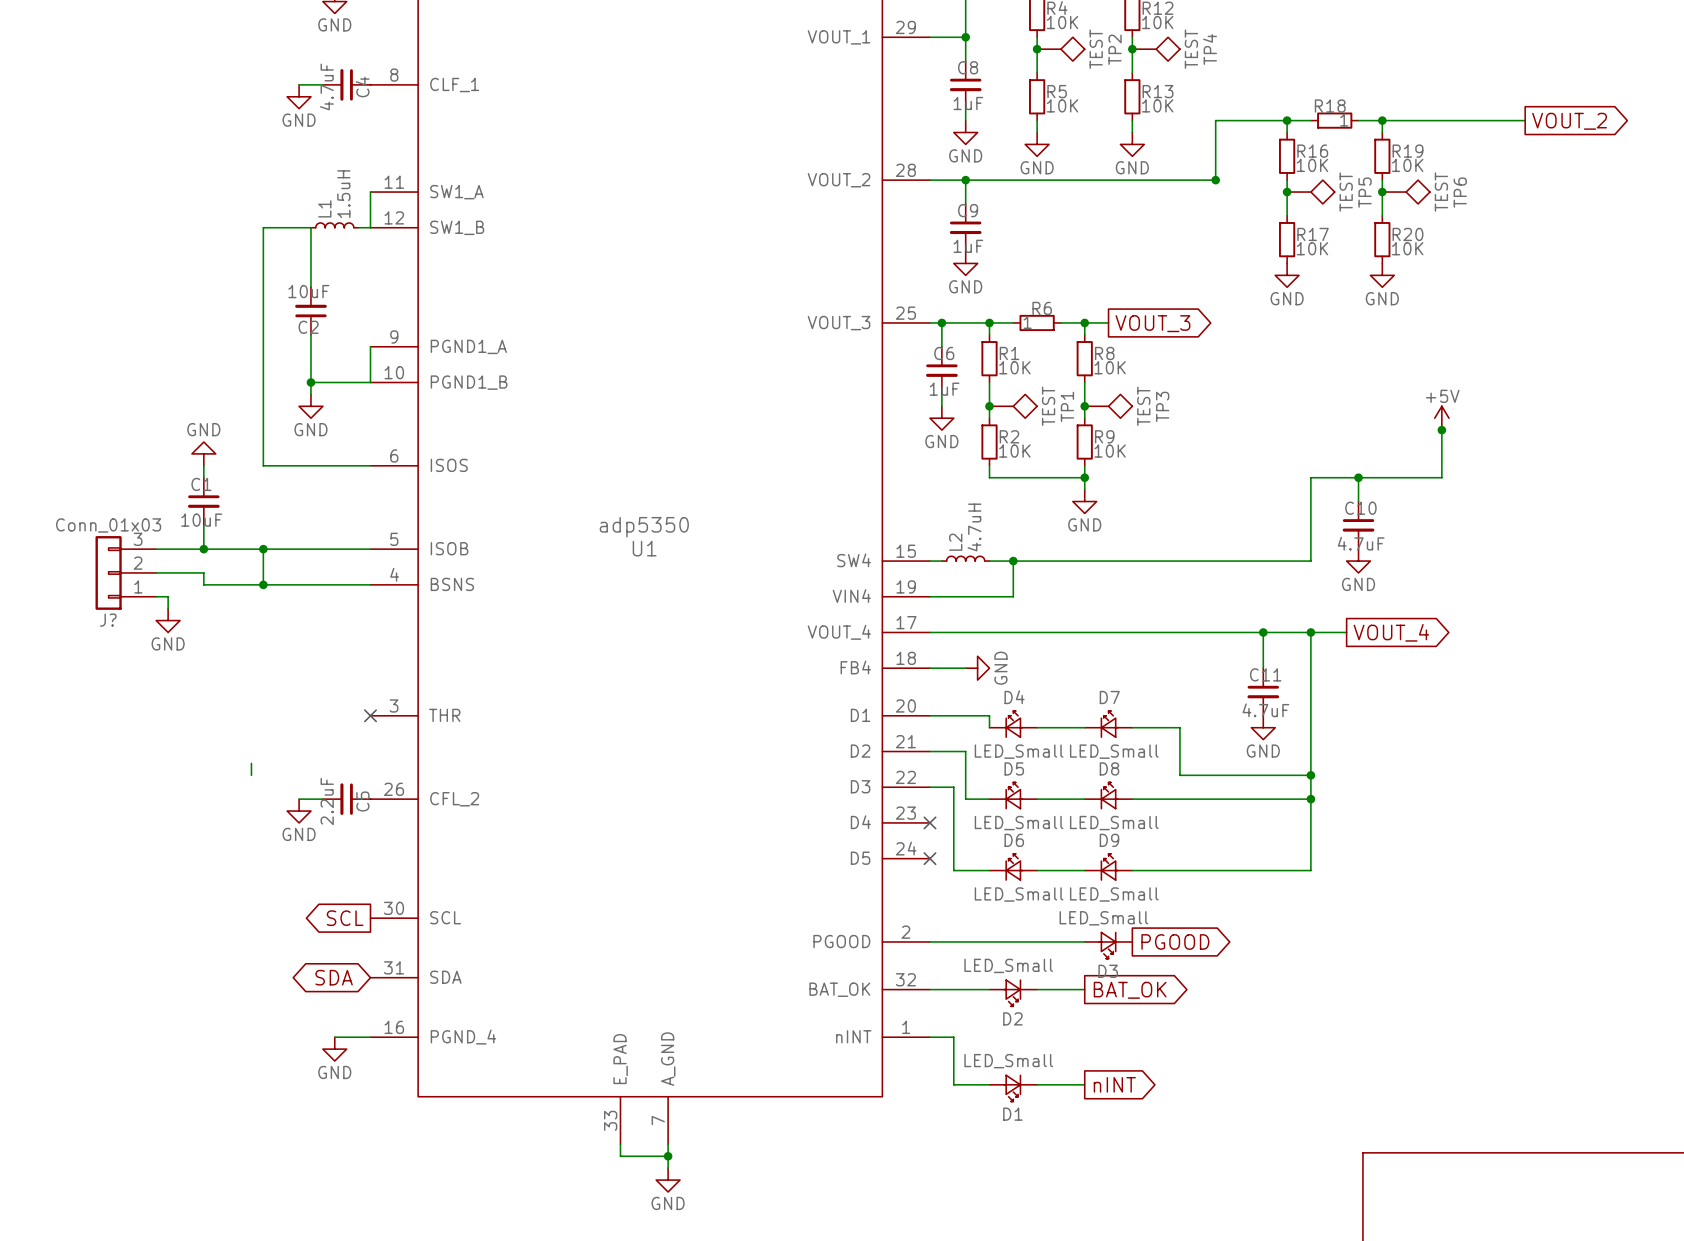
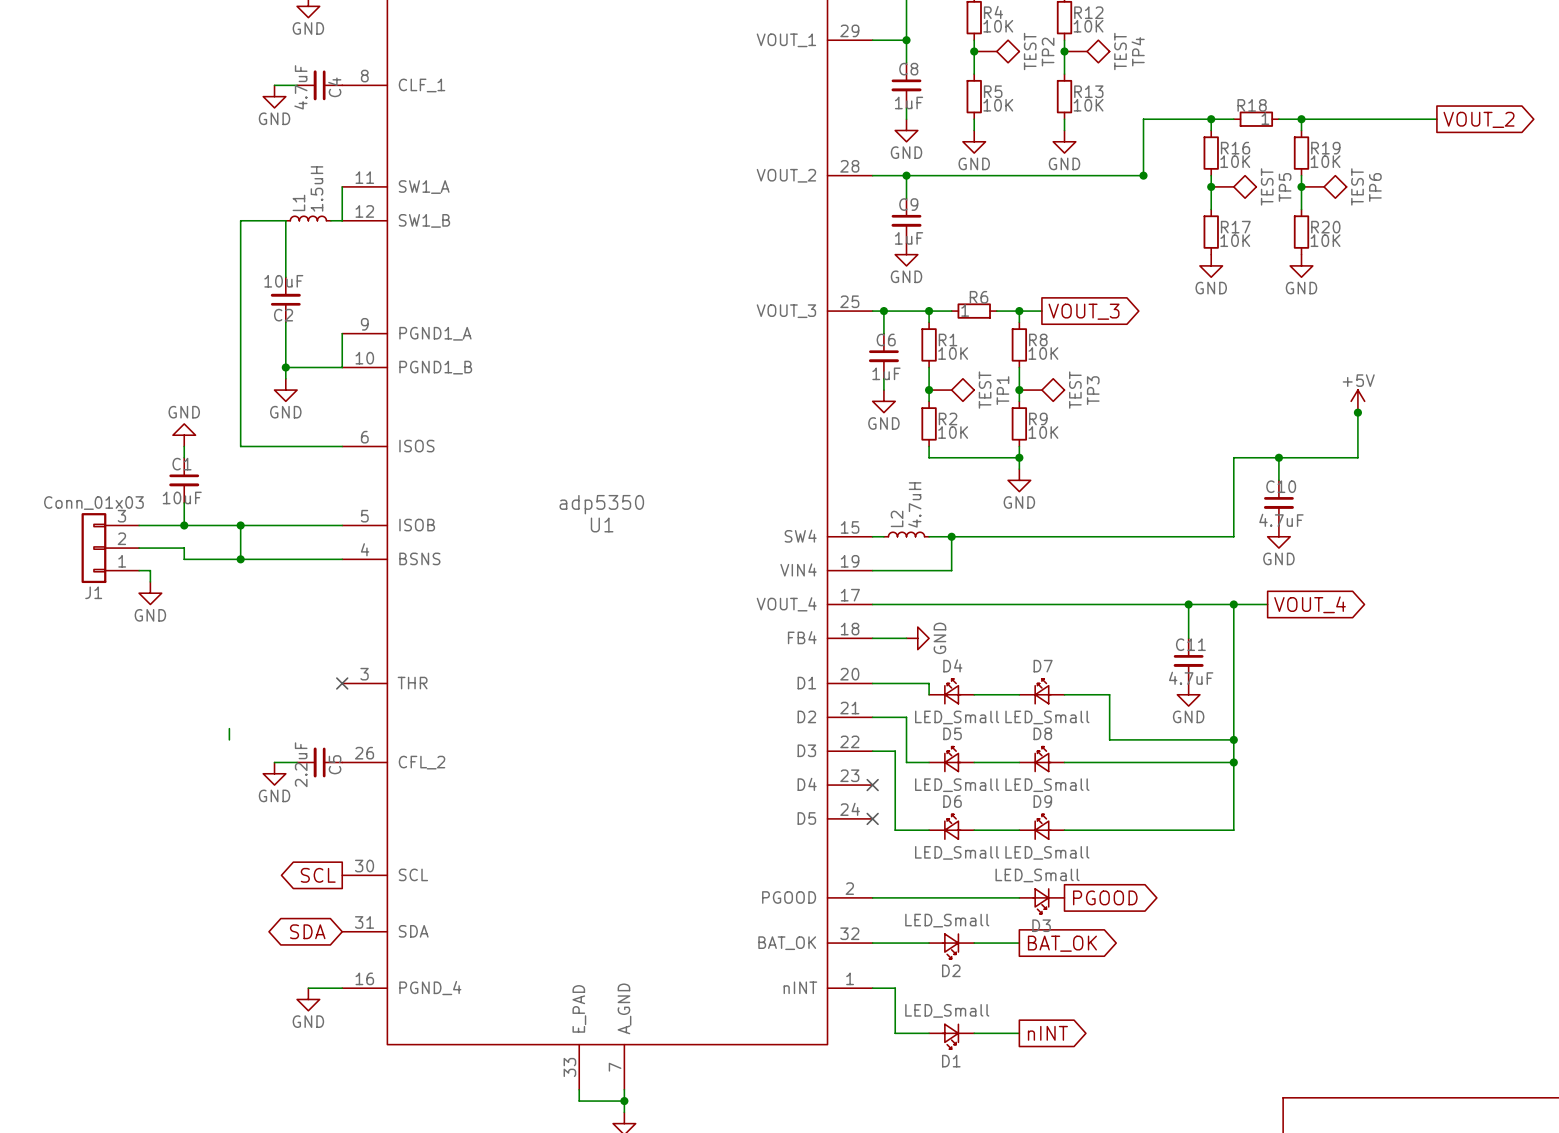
J? name: J? (108, 620) -> J1 (93, 592)

